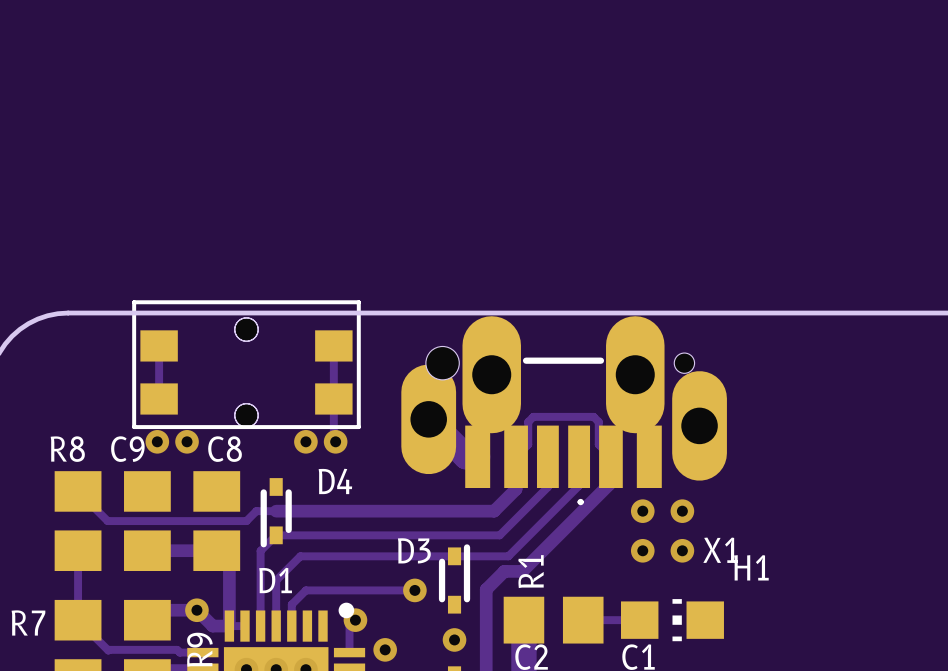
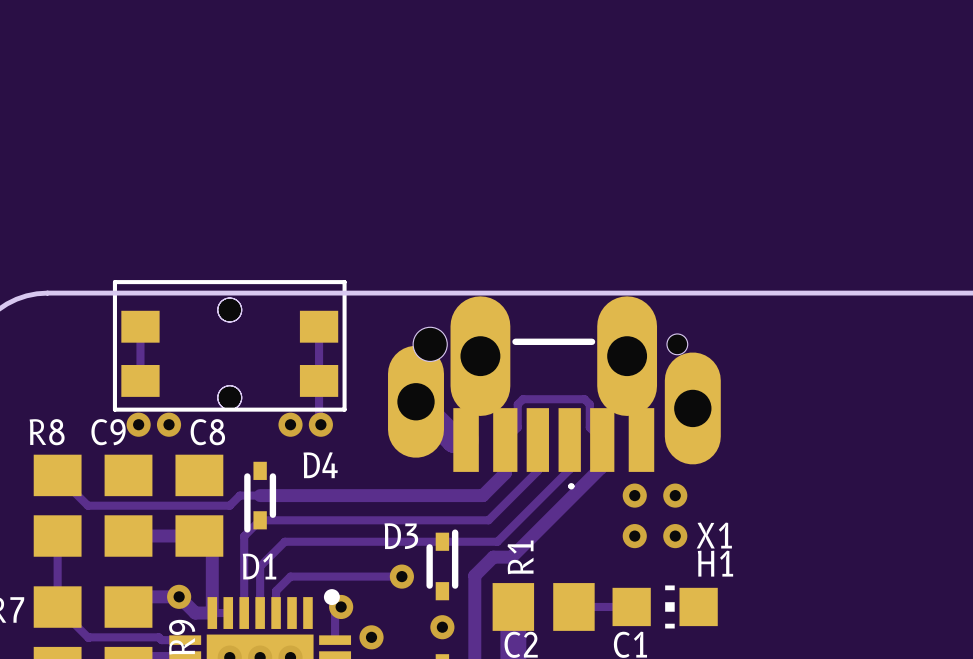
H1 name position: H1 (751, 567) -> H1 (715, 563)

